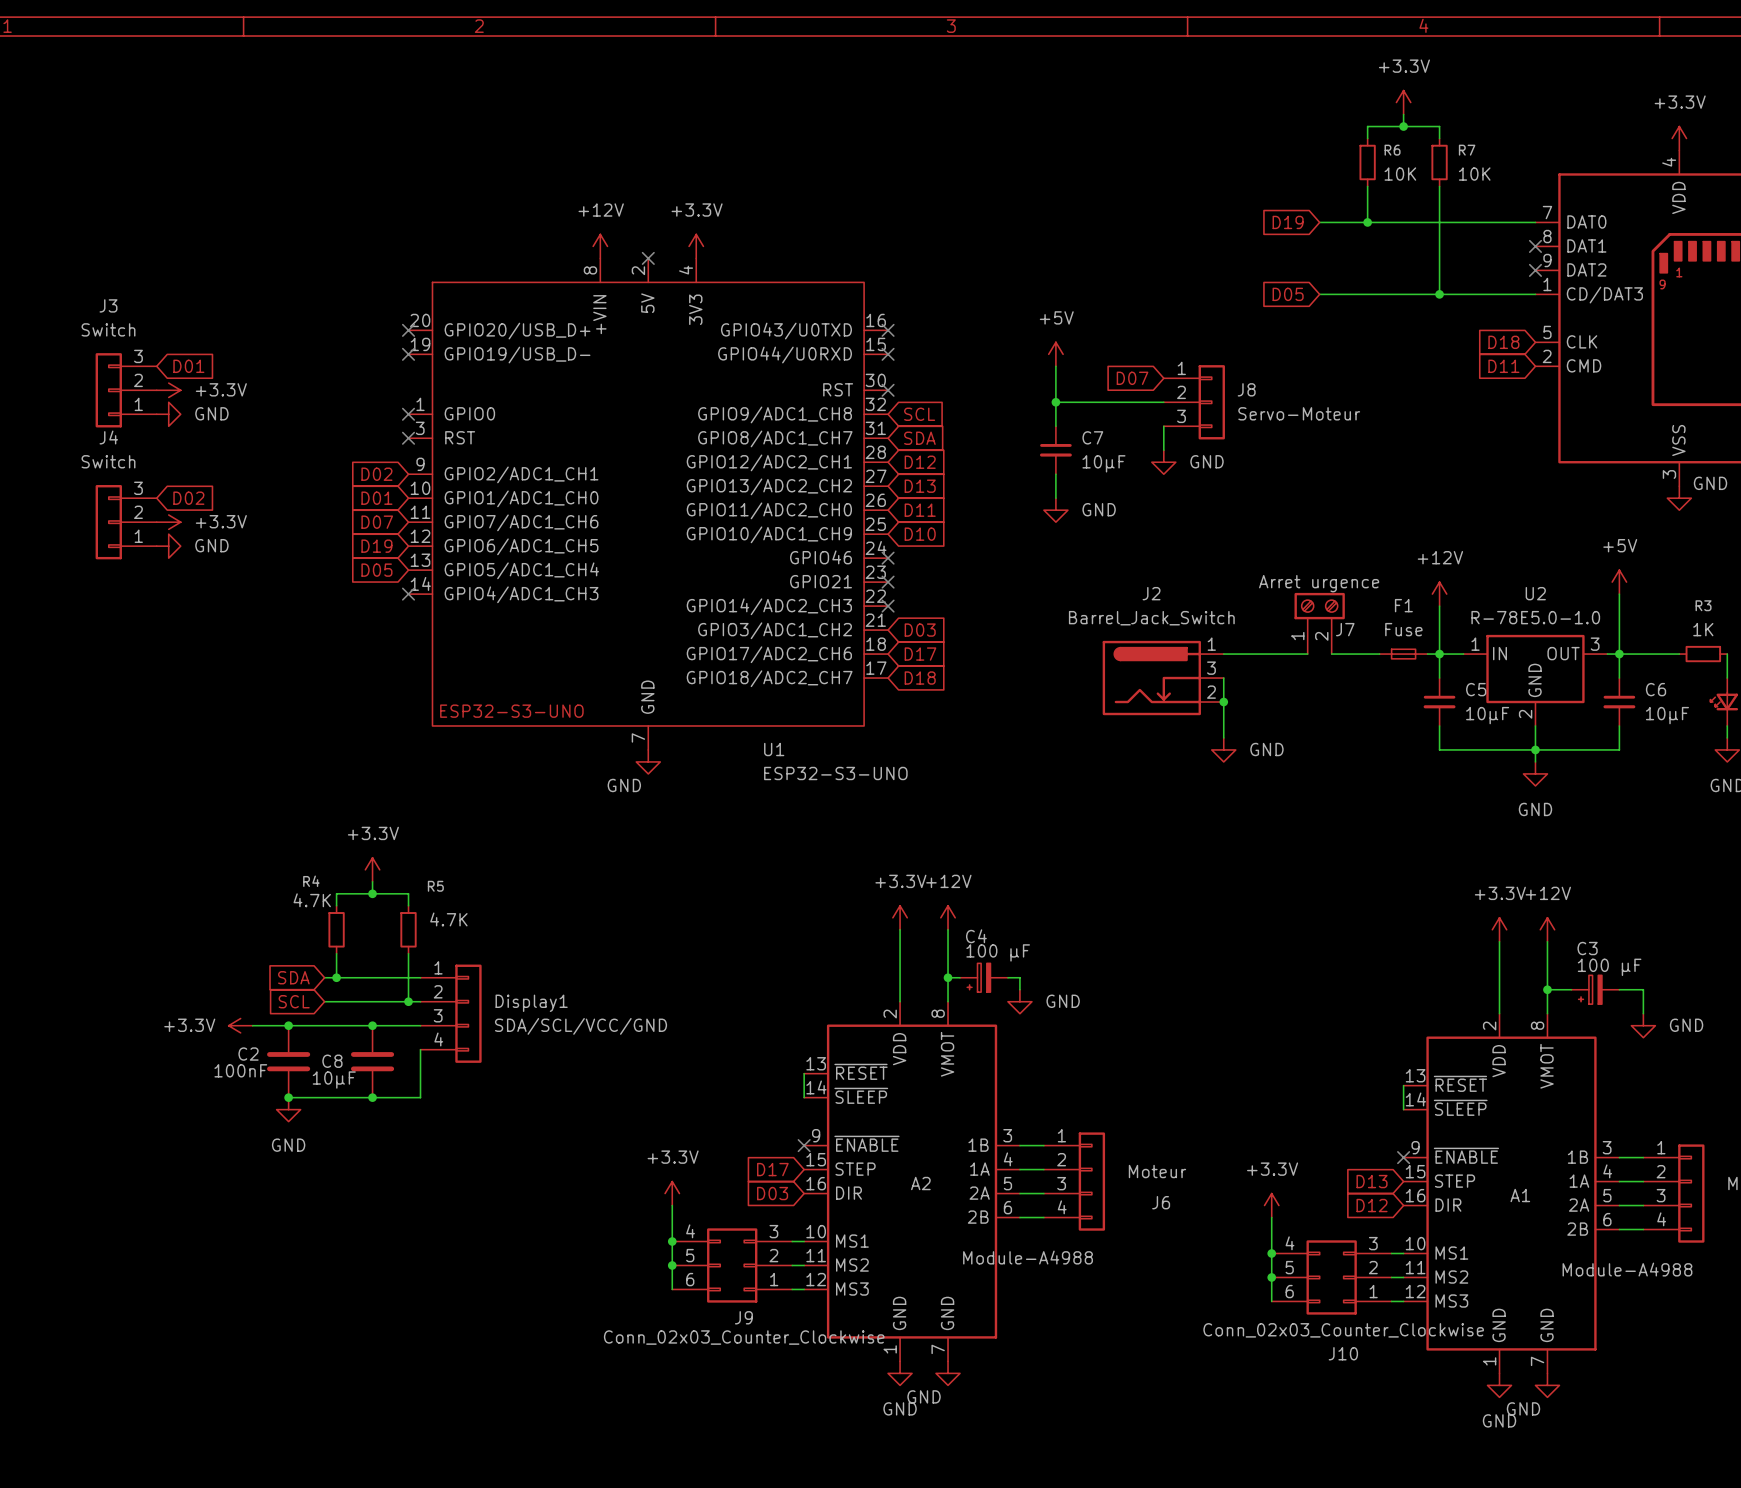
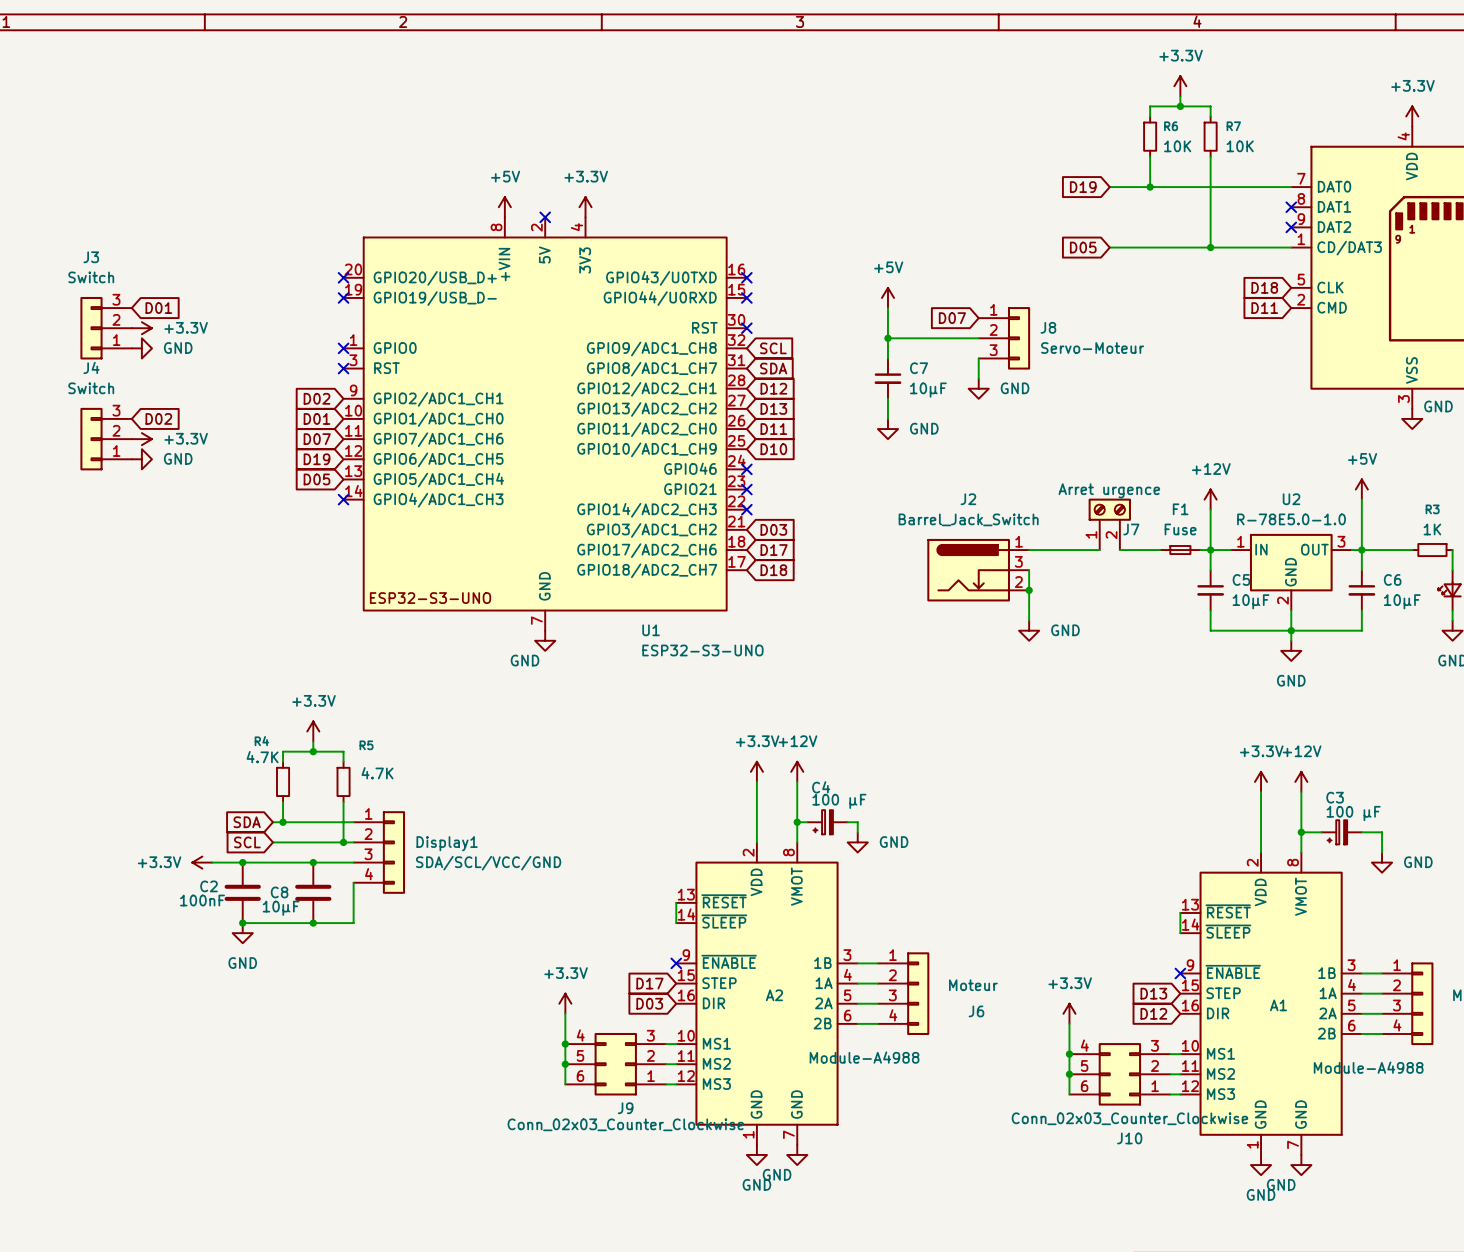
power symbol: +12V (600, 246) -> +5V (504, 207)

